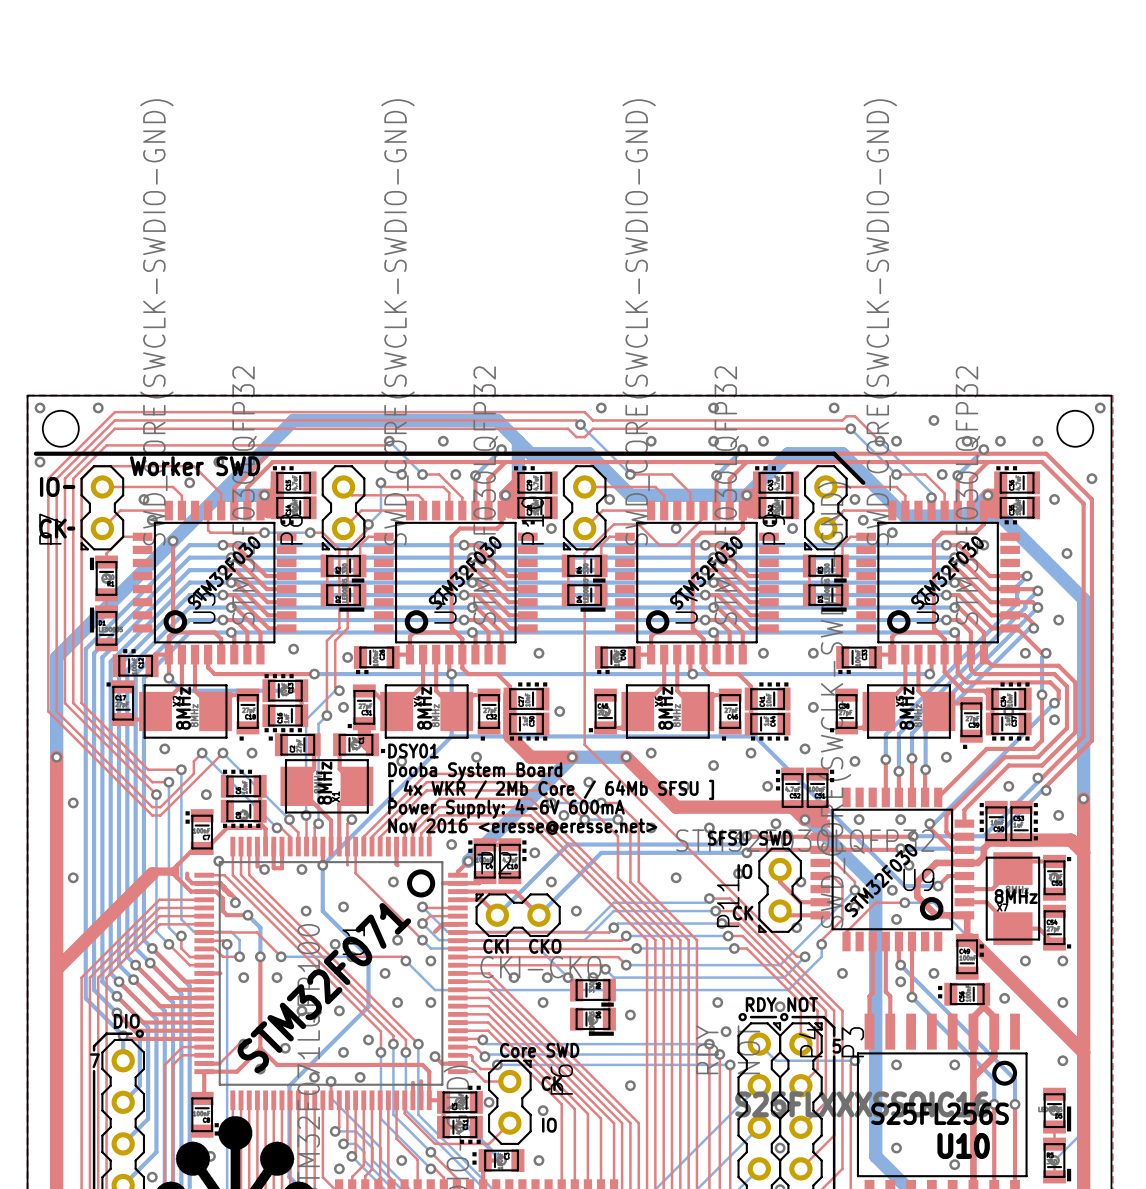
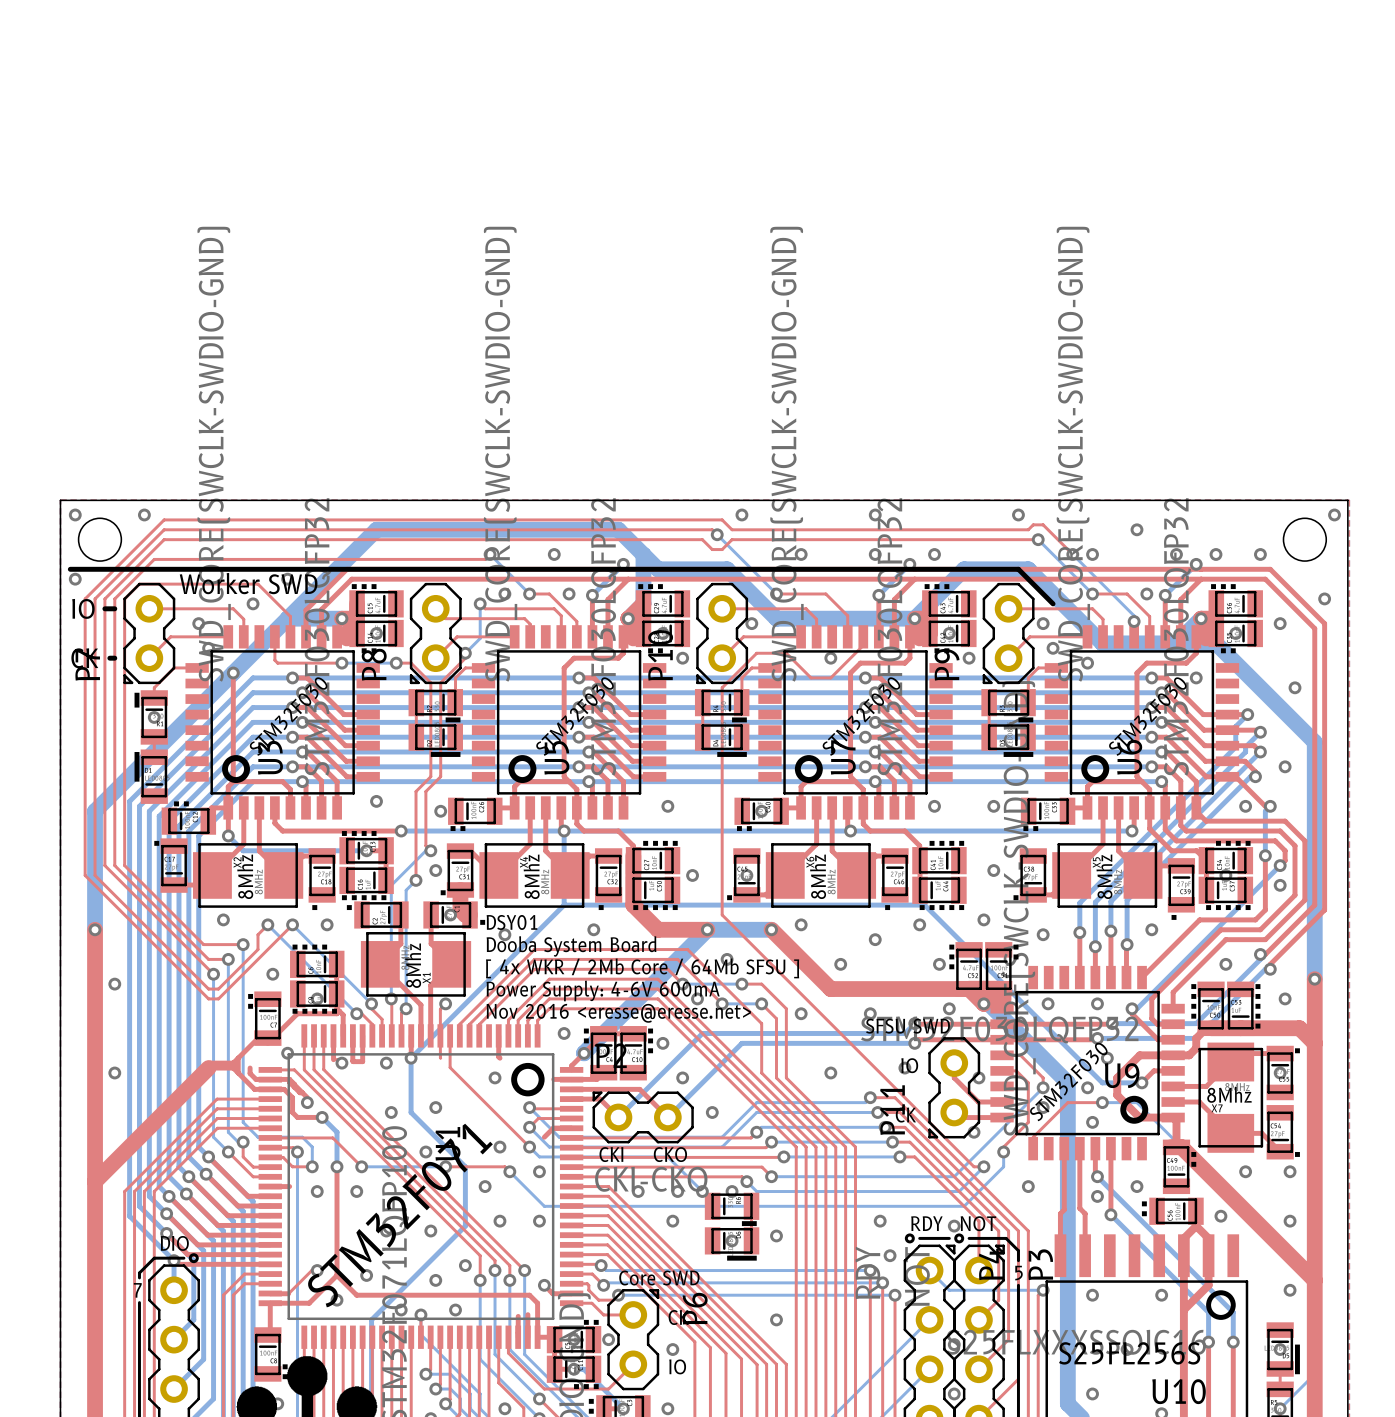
text: 8MHz (183, 708) -> 8Mhz (245, 876)
text: 8MHz (424, 708) -> 8Mhz (531, 876)
text: 8MHz (665, 708) -> 8Mhz (818, 876)
text: 8MHz (906, 708) -> 8Mhz (1104, 876)
text: 8MHz (324, 783) -> 8Mhz (413, 965)
text: 8MHz (1016, 896) -> 8Mhz (1229, 1094)

